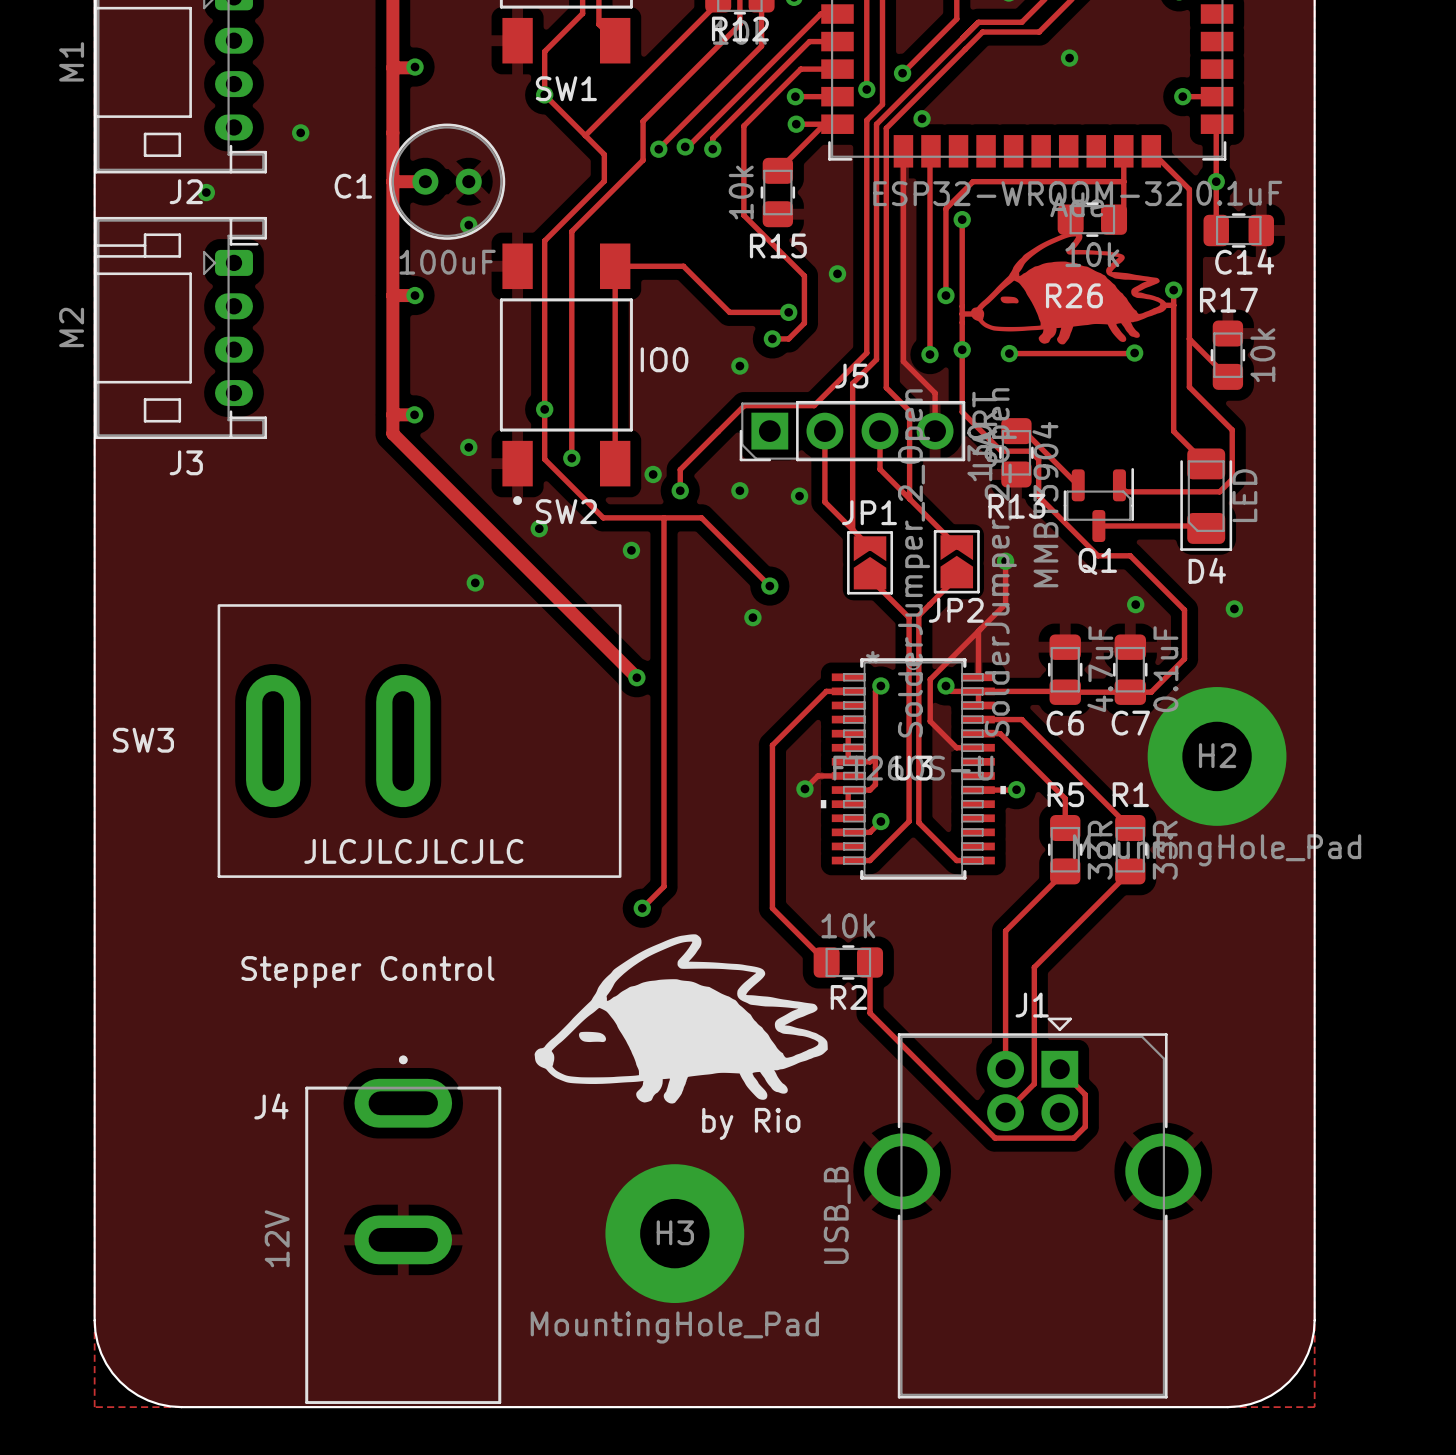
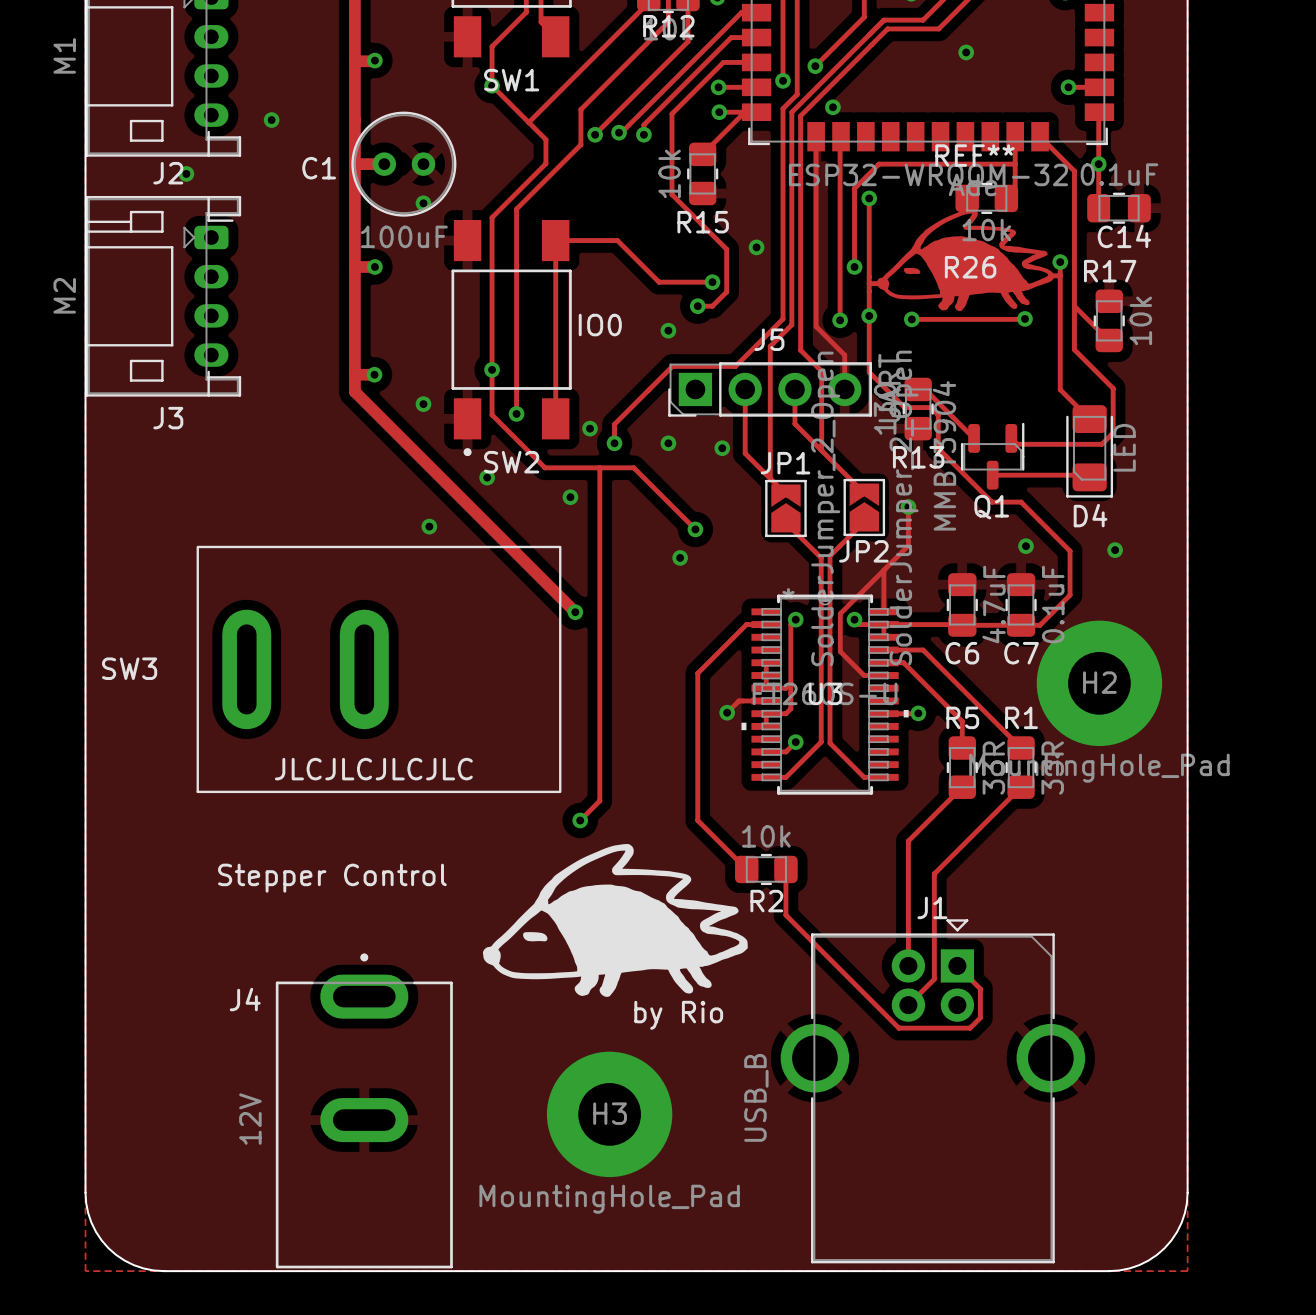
REF** name: none -> REF** (974, 155)

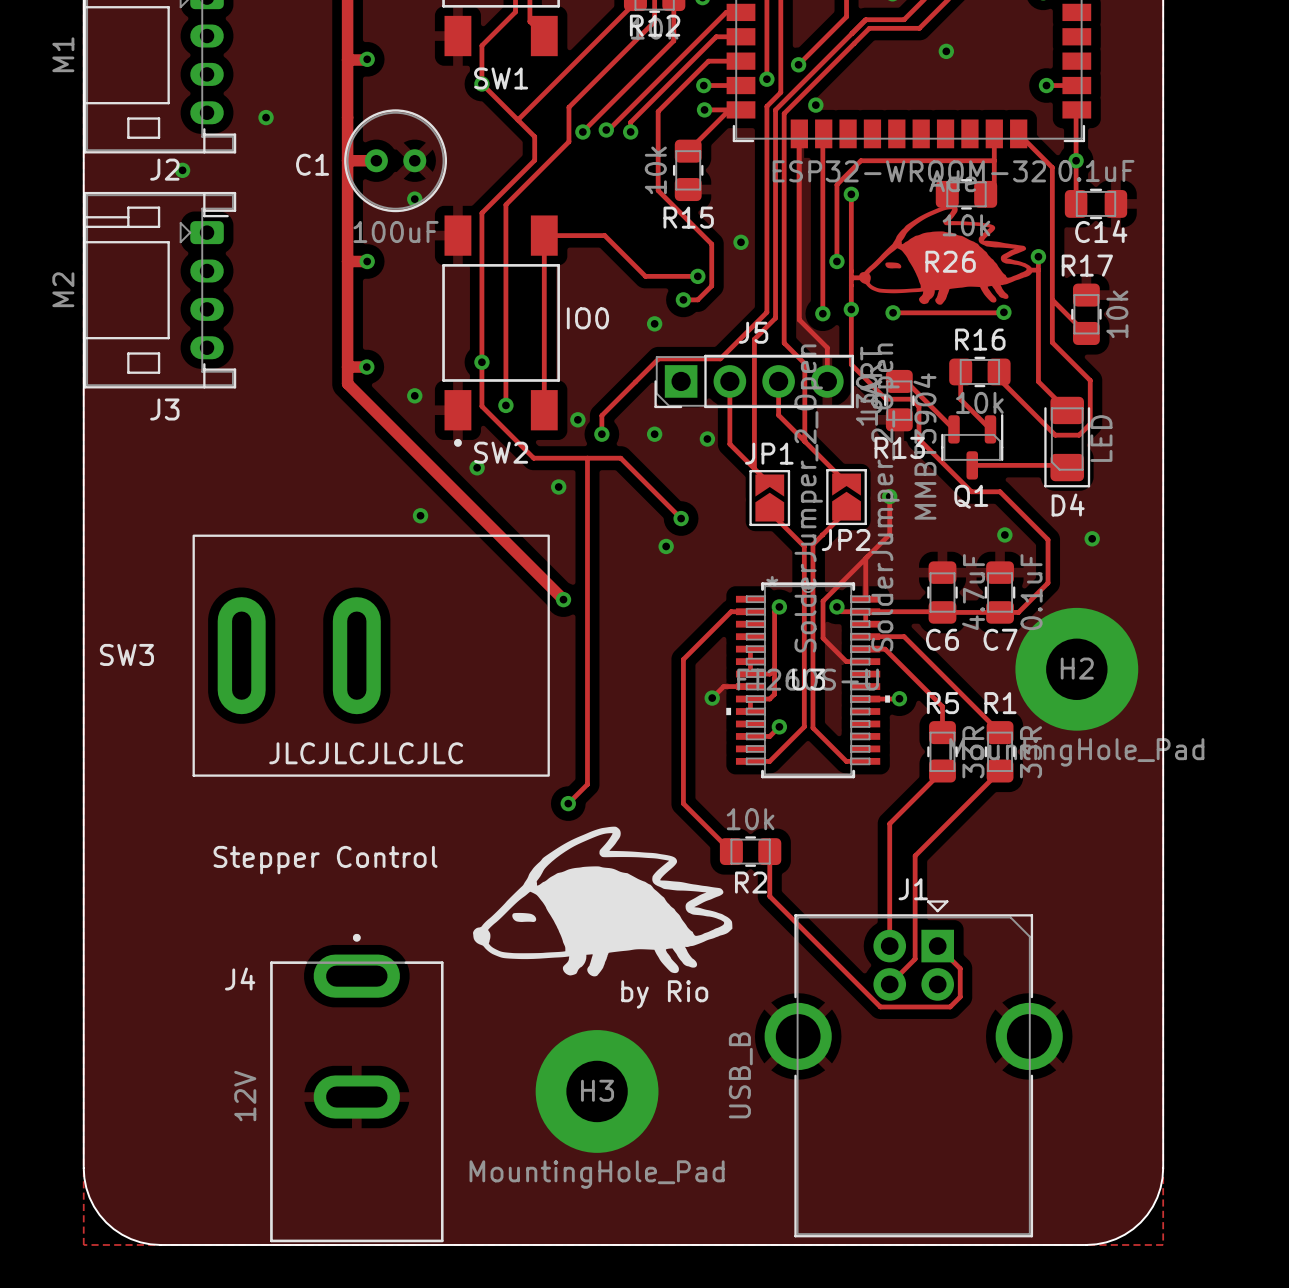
REF** name: REF** (974, 155) -> none
track: none -> (960, 371) (960, 399) (990, 429)
R16: none -> 10k (979, 371)
track: (1011, 438) (1017, 444) (1077, 444) -> (999, 371) (999, 378) (1055, 435)

